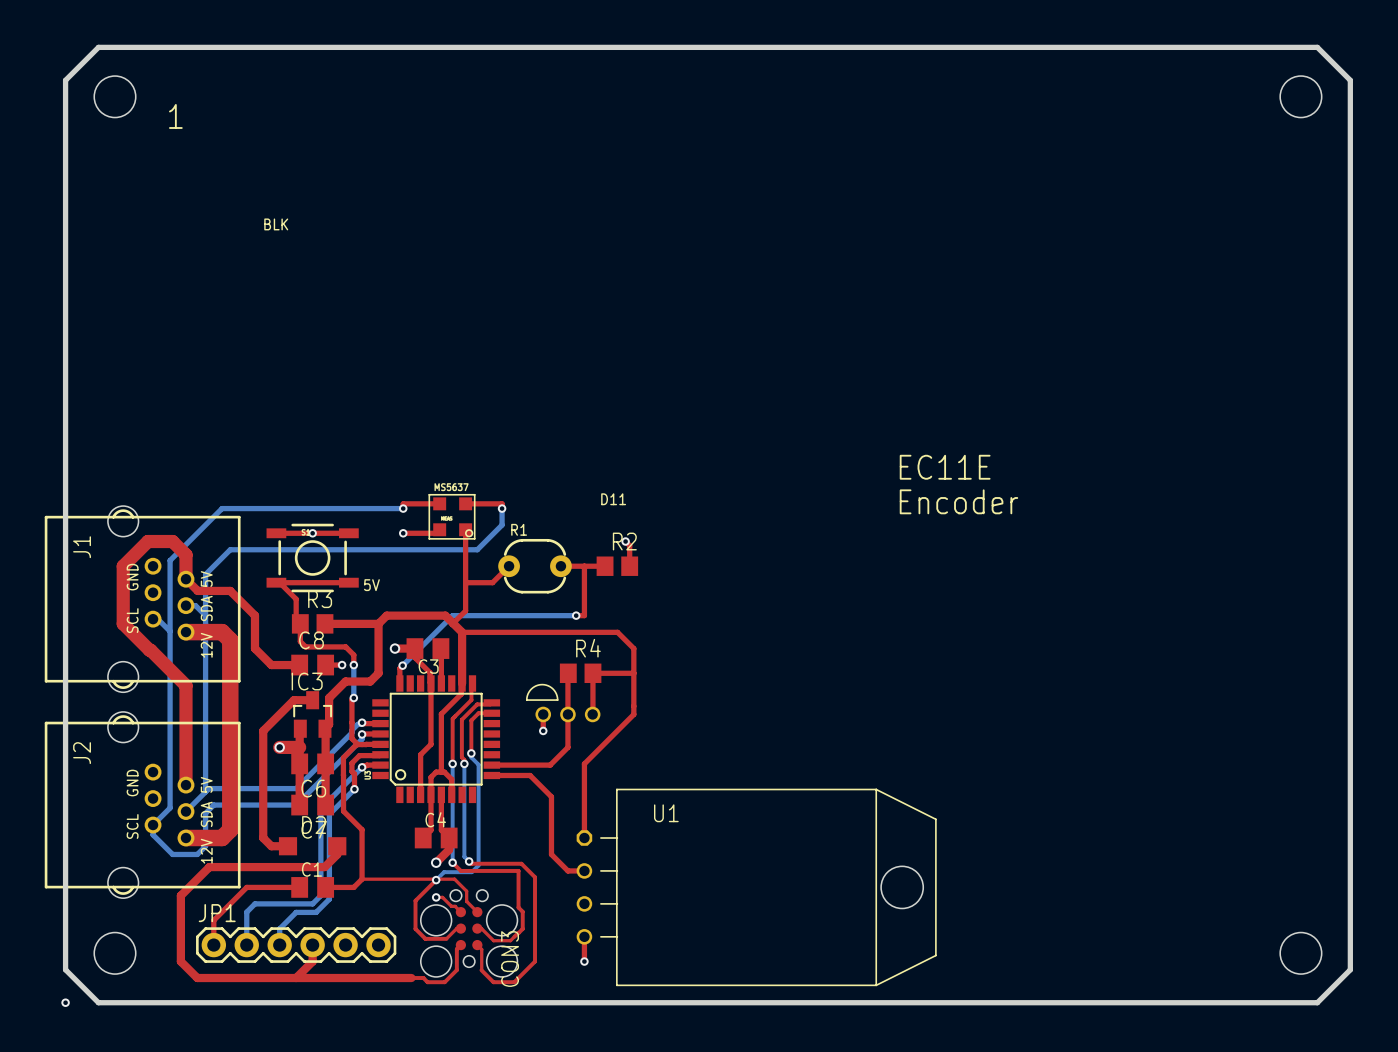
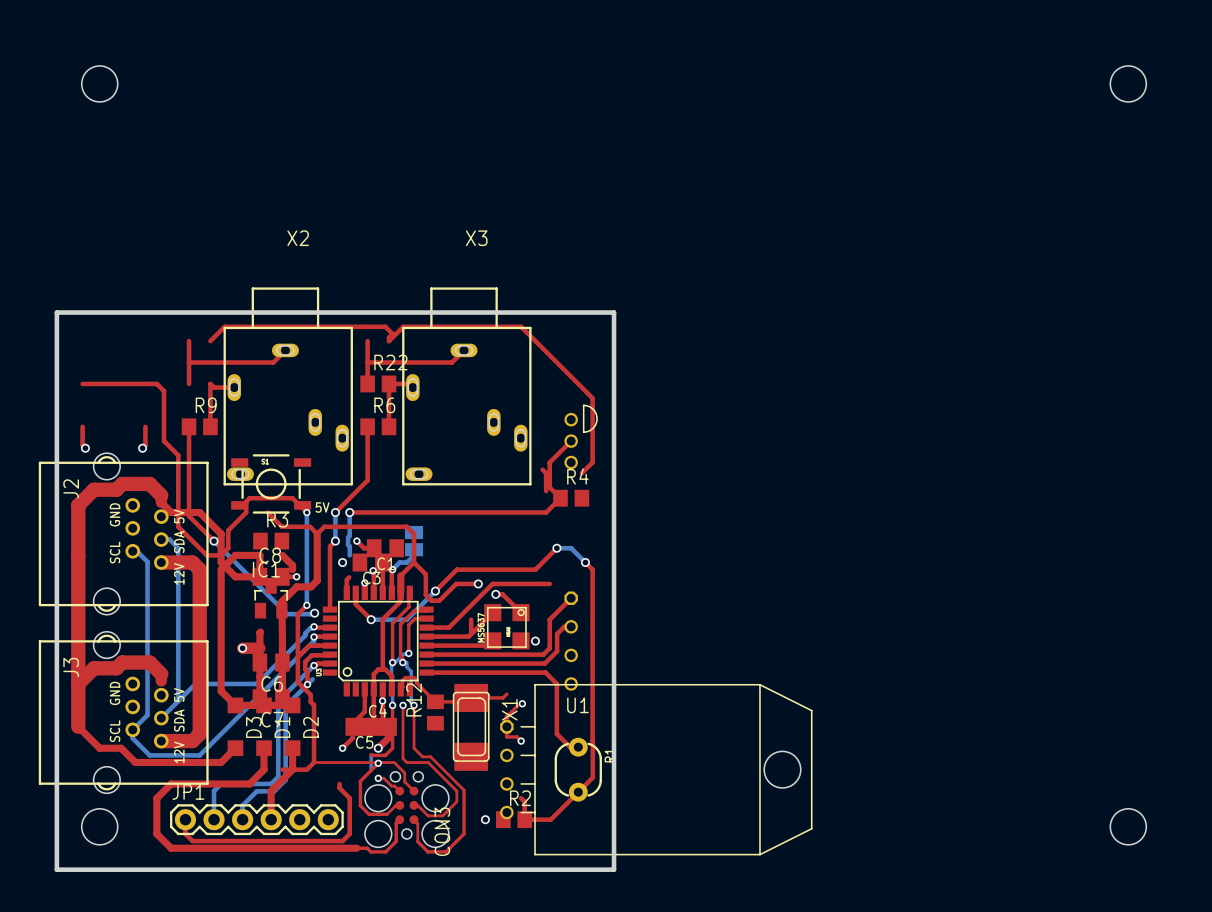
text: 1 (175, 116) -> none
text: BLK (276, 224) -> none
board edge: (65, 360) (65, 80) (98, 47) (1317, 47) (1350, 80) (1350, 969) (1317, 1002) (707, 1002) -> (56, 312) (614, 312) (614, 869)
top track: none -> (189, 341) (189, 383)
top track: none -> (210, 341) (224, 326) (385, 326) (392, 333) (388, 337) (388, 341) (403, 326) (521, 326) (592, 398) (592, 462) (581, 473)
top track: none -> (367, 341) (367, 383)
top track: none -> (285, 350) (273, 362) (189, 362)
top track: none -> (464, 350) (451, 362) (367, 362)
top track: none -> (82, 383) (156, 383) (164, 391) (164, 441) (178, 455) (178, 526) (206, 555) (221, 555) (228, 548) (228, 530) (246, 512) (246, 501) (249, 498) (292, 498) (306, 512)
R22: none -> (378, 383)
X2: none -> (288, 386)
X3: none -> (466, 386)
top track: none -> (234, 387) (214, 387) (210, 383) (210, 426)
top track: none -> (412, 387) (409, 383) (388, 383) (388, 426)
text: EC11E (945, 467) -> none
top track: none -> (82, 426) (82, 445) (85, 448)
top track: none -> (145, 426) (145, 445) (142, 448)
top track: none -> (189, 426) (189, 516) (214, 541)
R9: none -> (199, 426)
top track: none -> (367, 426) (367, 480) (335, 512)
R6: none -> (378, 426)
text: D11 (613, 499) -> none
text: Encoder (958, 501) -> none
top track: (439, 503) (403, 503) (403, 508) -> none
top track: (465, 503) (502, 503) (502, 508) -> none
bottom track: (403, 508) (222, 508) (170, 560) (170, 647) -> (132, 551) (136, 551) (147, 561)
via: (403, 508) -> none
bottom track: (502, 508) (502, 525) (477, 549) (230, 549) (205, 574) (205, 632) -> (161, 539) (169, 539) (178, 548)
via: (502, 508) -> none
top track: none -> (571, 441) (549, 462) (549, 487) (560, 498) (546, 512) (349, 512)
via: none -> (85, 448)
via: none -> (142, 448)
part: (452, 516) -> none
top track: (439, 529) (436, 533) (403, 533) -> none
top track: (465, 529) (465, 610) (453, 623) -> none
top track: (276, 533) (348, 533) -> none
via: (312, 533) -> none
via: (403, 533) -> none
via: (625, 541) -> none
R1 rotation: 0° (535, 566) -> 90° clockwise (578, 769)
R1 position: (535, 566) -> (578, 769)
top track: (560, 566) (605, 566) -> none
top track: (584, 566) (584, 615) (576, 615) -> none
R2 position: (617, 566) -> (514, 819)
top track: (509, 567) (492, 582) (465, 582) -> none
top track: (186, 571) (186, 554) (172, 541) (147, 541) (123, 566) (123, 623) (186, 685) (186, 777) -> (161, 495) (149, 483) (122, 483) (116, 489) (93, 489) (78, 505) (78, 726) (99, 748) (121, 748) (135, 762) (221, 762) (235, 748)
top track: (276, 582) (348, 582) -> none
top track: (279, 582) (296, 599) (296, 619) (300, 623) (300, 641) (305, 646) (345, 646) (353, 655) (353, 665) -> none
top track: none -> (267, 512) (281, 526) (310, 526) (317, 533)
bottom track: none -> (306, 512) (306, 576)
via: none -> (306, 512)
bottom track: none -> (335, 512) (335, 541)
via: none -> (335, 512)
bottom track: none -> (349, 512) (349, 535) (348, 537) (349, 555)
via: none -> (349, 512)
J1: (142, 599) -> none
bottom track: (186, 605) (195, 605) (205, 615) -> none
top track: none -> (317, 533) (324, 526) (406, 526) (414, 533) (414, 562)
bottom track: (576, 615) (452, 615) (402, 665) -> none
via: (576, 615) -> none
bottom track: (153, 619) (157, 619) (170, 631) -> none
bottom track: none -> (214, 541) (287, 614) (314, 613)
via: none -> (214, 541)
top track: (324, 623) (378, 623) -> none
top track: (378, 623) (378, 673) (370, 681) (345, 681) (329, 697) (329, 724) (325, 729) -> (317, 533) (317, 580) (311, 586) (296, 586) (281, 601) (282, 632)
top track: (378, 623) (386, 615) (445, 615) (462, 632) -> none
top track: none -> (335, 541) (330, 546) (330, 609)
via: none -> (335, 541)
top track: none -> (356, 541) (364, 548) (374, 548)
via: none -> (356, 541)
part: none -> (414, 541)
top track: (186, 632) (222, 632) (230, 640) (230, 656) -> (161, 562) (192, 562) (199, 569)
top track: (462, 632) (462, 663) -> (414, 562) (400, 575)
top track: (462, 632) (617, 632) (633, 648) (633, 714) (584, 763) (584, 826) -> (517, 705) (506, 716)
top track: none -> (556, 548) (535, 569) (456, 569) (435, 591)
bottom track: none -> (556, 548) (571, 548) (585, 562)
via: none -> (556, 548)
bottom track: none -> (414, 549) (414, 555) (406, 562) (399, 562) (392, 569)
top track: none -> (282, 555) (292, 565) (292, 569)
top track: (395, 648) (414, 648) (414, 657) (430, 672) (430, 744) (420, 754) (420, 794) -> (342, 748) (352, 738) (352, 726) (364, 711) (364, 689)
top track: none -> (414, 562) (425, 574) (425, 595) (431, 600) (439, 600) (456, 583) (478, 583)
top track: none -> (585, 562) (592, 569) (592, 777) (550, 819) (524, 819) (524, 801) (521, 798)
via: none -> (585, 562)
top track: none -> (392, 569) (391, 592)
via: none -> (392, 569)
top track: none -> (373, 570) (373, 592)
via: none -> (373, 570)
via: (353, 665) -> none
via: (402, 665) -> none
via: none -> (364, 582)
via: none -> (478, 583)
top track: (568, 673) (567, 747) (550, 765) -> (571, 626) (564, 626) (557, 633) (557, 651) (544, 663) (477, 663)
R4 position: (580, 673) -> (571, 498)
top track: (592, 673) (592, 714) -> (514, 583) (492, 583) (448, 627) (426, 627)
top track: none -> (271, 585) (259, 574) (259, 555) (235, 555) (221, 569) (221, 691) (235, 705) (292, 705)
bottom track: none -> (435, 591) (406, 619) (371, 619)
via: none -> (435, 591)
top track: none -> (355, 592) (355, 604) (371, 619)
top track: none -> (495, 594) (502, 594) (520, 612)
via: none -> (495, 594)
IC1: none -> (271, 598)
top track: none -> (571, 598) (549, 619) (549, 648) (543, 654) (426, 654)
top track: (351, 699) (351, 738) (357, 744) -> (305, 607) (297, 614) (297, 657)
top track: (312, 700) (293, 700) (263, 730) (263, 838) (271, 846) (288, 846) -> none
part rotation: 0° (563, 703) -> 90° clockwise (581, 436)
part position: (563, 703) -> (581, 436)
via: none -> (314, 613)
top track: none -> (492, 612) (468, 636) (426, 636)
IC3: (312, 714) -> none
via: none -> (371, 619)
part: none -> (506, 626)
via: (543, 730) -> none
top track: none -> (492, 640) (488, 645) (426, 645)
via: none -> (535, 641)
part: none -> (571, 641)
bottom track: (471, 753) (471, 757) (478, 764) (478, 865) (471, 872) (444, 872) (436, 880) -> none
bottom track: (452, 763) (452, 779) -> (408, 651) (391, 666) (392, 676)
bottom track: (464, 763) (464, 856) (469, 861) -> none
bottom track: none -> (406, 662) (406, 667) (411, 671) (411, 702) (414, 705)
top track: (343, 775) (343, 811) (362, 829) -> (297, 672) (297, 682) (310, 694) (310, 701) (314, 705) (314, 719)
top track: (530, 775) (551, 796) (551, 854) (567, 870) (584, 870) -> (459, 672) (545, 672) (556, 683) (556, 733) (570, 747) (578, 747)
top track: none -> (161, 674) (149, 662) (122, 662) (116, 668) (93, 668) (78, 683)
bottom track: none -> (312, 679) (307, 684)
bottom track: (225, 788) (208, 788) (186, 811) -> (195, 683) (161, 718)
bottom track: none -> (178, 686) (178, 701)
top track: none -> (400, 689) (405, 677) (414, 677) (416, 683) (435, 701) (467, 701) (471, 697) (503, 697) (506, 694)
J2 position: (142, 805) -> (123, 533)
bottom track: (296, 805) (213, 805) (205, 813) (205, 846) (197, 854) (172, 854) (153, 834) (153, 825) (170, 808) -> (256, 698) (199, 755) (149, 755) (132, 738) (132, 729) (147, 715) (147, 700)
via: none -> (382, 700)
via: none -> (522, 703)
top track: none -> (392, 705) (392, 748) (385, 755) (371, 754)
bottom track: (452, 813) (452, 862) -> none
via: none -> (392, 705)
via: none -> (403, 705)
via: none -> (414, 705)
J3: none -> (123, 712)
R12: none -> (435, 712)
top track: (230, 829) (222, 838) (186, 838) -> (199, 719) (199, 733) (192, 741) (161, 741)
D3: none -> (235, 726)
D1: none -> (264, 726)
C5: none -> (364, 726)
X1: none -> (471, 727)
top track: none -> (506, 726) (506, 736) (517, 736) (521, 741)
D2 rotation: 0° (312, 846) -> 90° clockwise (292, 726)
top track: (337, 846) (337, 854) (324, 867) (209, 867) (180, 895) (180, 920) -> (264, 748) (264, 769) (249, 783) (171, 783) (156, 798)
via: none -> (521, 741)
top track: (469, 861) (471, 863) (521, 863) (535, 877) (535, 911) -> (414, 705) (414, 748) (422, 756) (430, 756) (464, 790)
via: (469, 861) -> none
via: none -> (342, 748)
top track: (452, 862) (460, 870) (518, 870) (518, 907) (522, 911) (522, 928) (518, 933) -> (403, 705) (403, 758) (406, 762) (428, 762) (456, 791) (456, 801) (449, 809)
via: (452, 862) -> none
C1 name position: C1 (311, 869) -> C1 (386, 563)
bottom track: none -> (371, 754) (371, 770)
top track: (299, 887) (246, 887) (213, 920) (213, 945) -> (339, 783) (339, 788) (349, 798) (349, 833) (342, 841) (192, 841) (185, 833) (185, 819)
C1 position: (312, 887) -> (385, 548)
top track: (584, 936) (584, 961) -> none
top track: (312, 945) (312, 961) (296, 978) -> (271, 819) (271, 791) (292, 769) (292, 748)
via: none -> (485, 819)
via: (584, 961) -> none
board edge: (65, 969) (98, 1002) -> (56, 841) (56, 869) (85, 869)
via: (65, 1002) -> none

